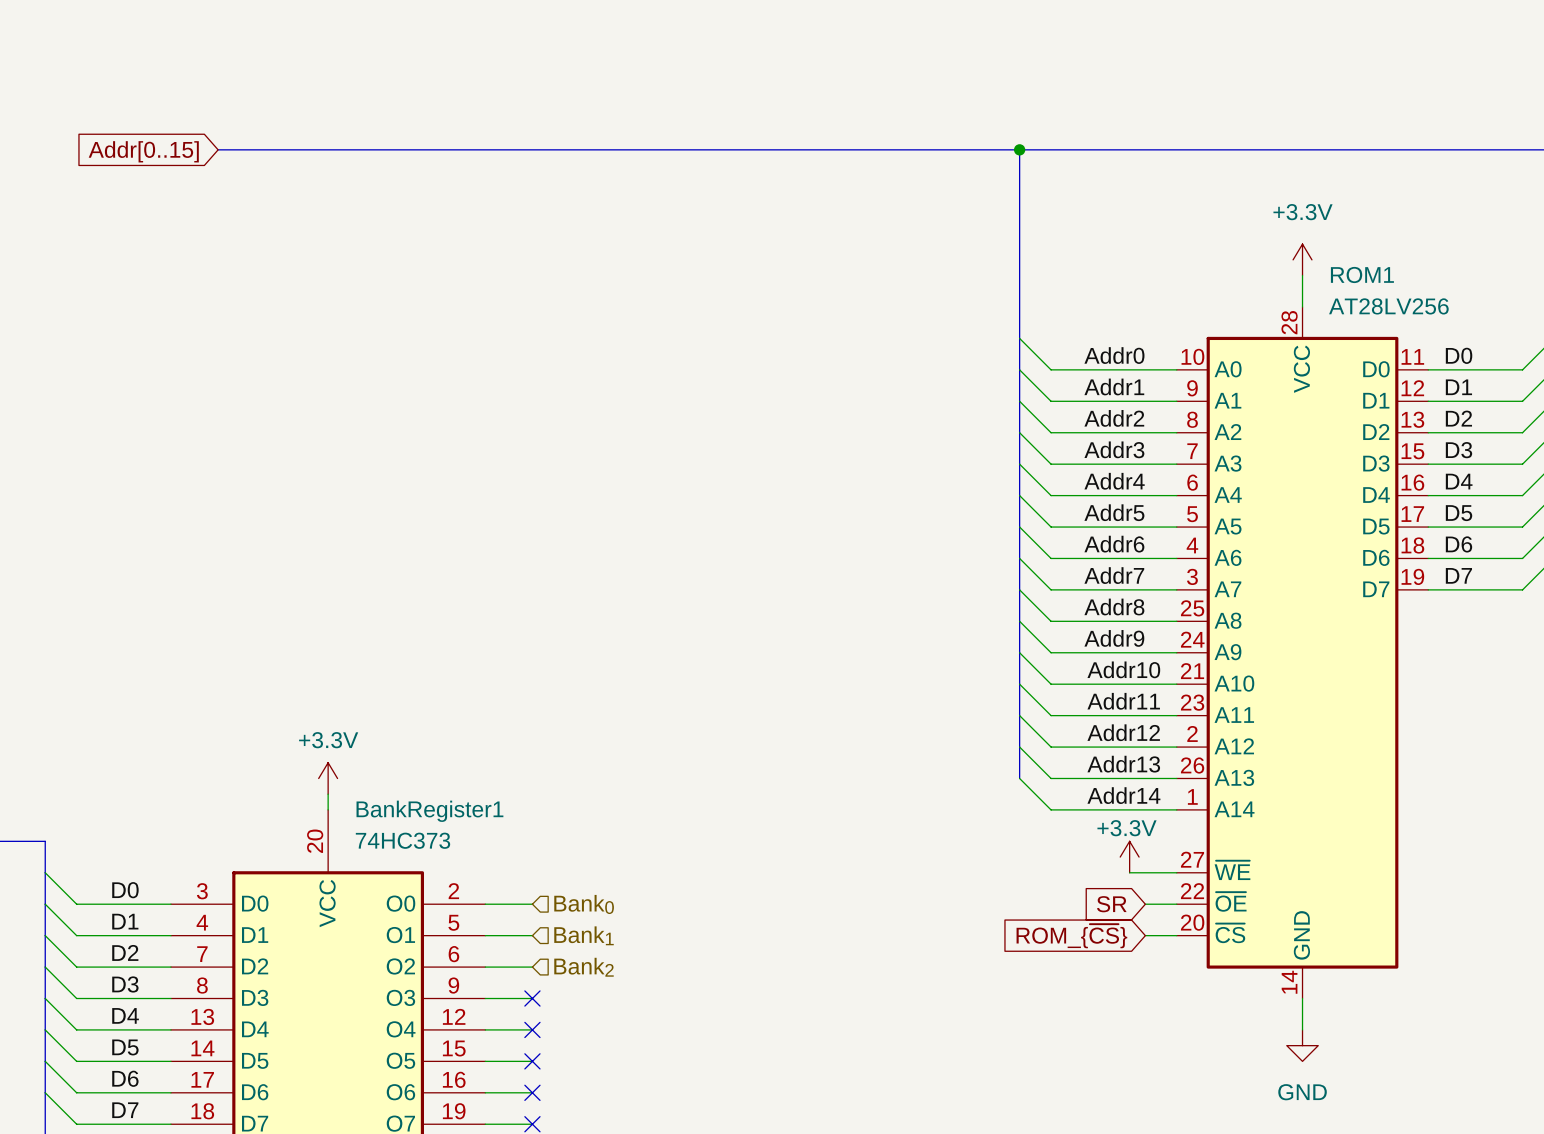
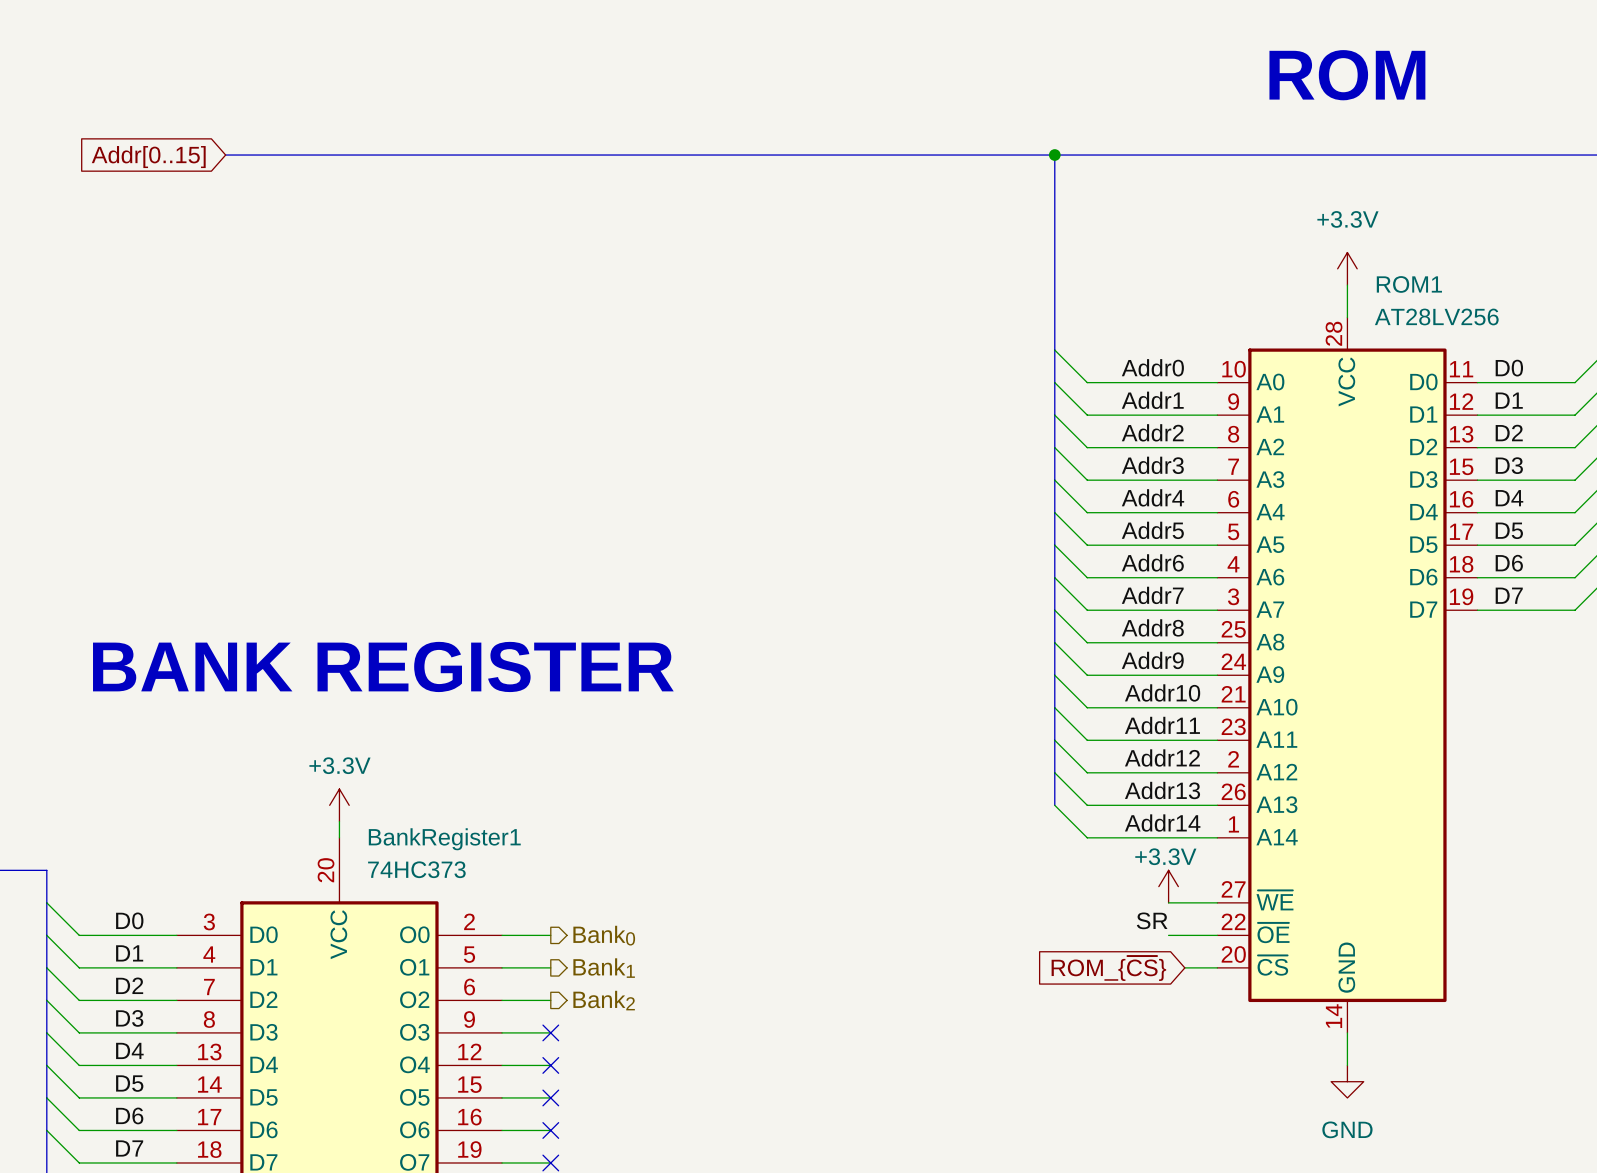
text: none -> ROM (1347, 75)
text: none -> BANK REGISTER (383, 666)
label: none -> SR (1152, 920)
hierarchical label shape: input (584, 904) -> output (604, 935)
global label: SR (1111, 904) -> none
wire: none -> (1168, 935) (1184, 935)
hierarchical label shape: input (584, 935) -> output (604, 968)
hierarchical label shape: input (583, 967) -> output (604, 1000)

